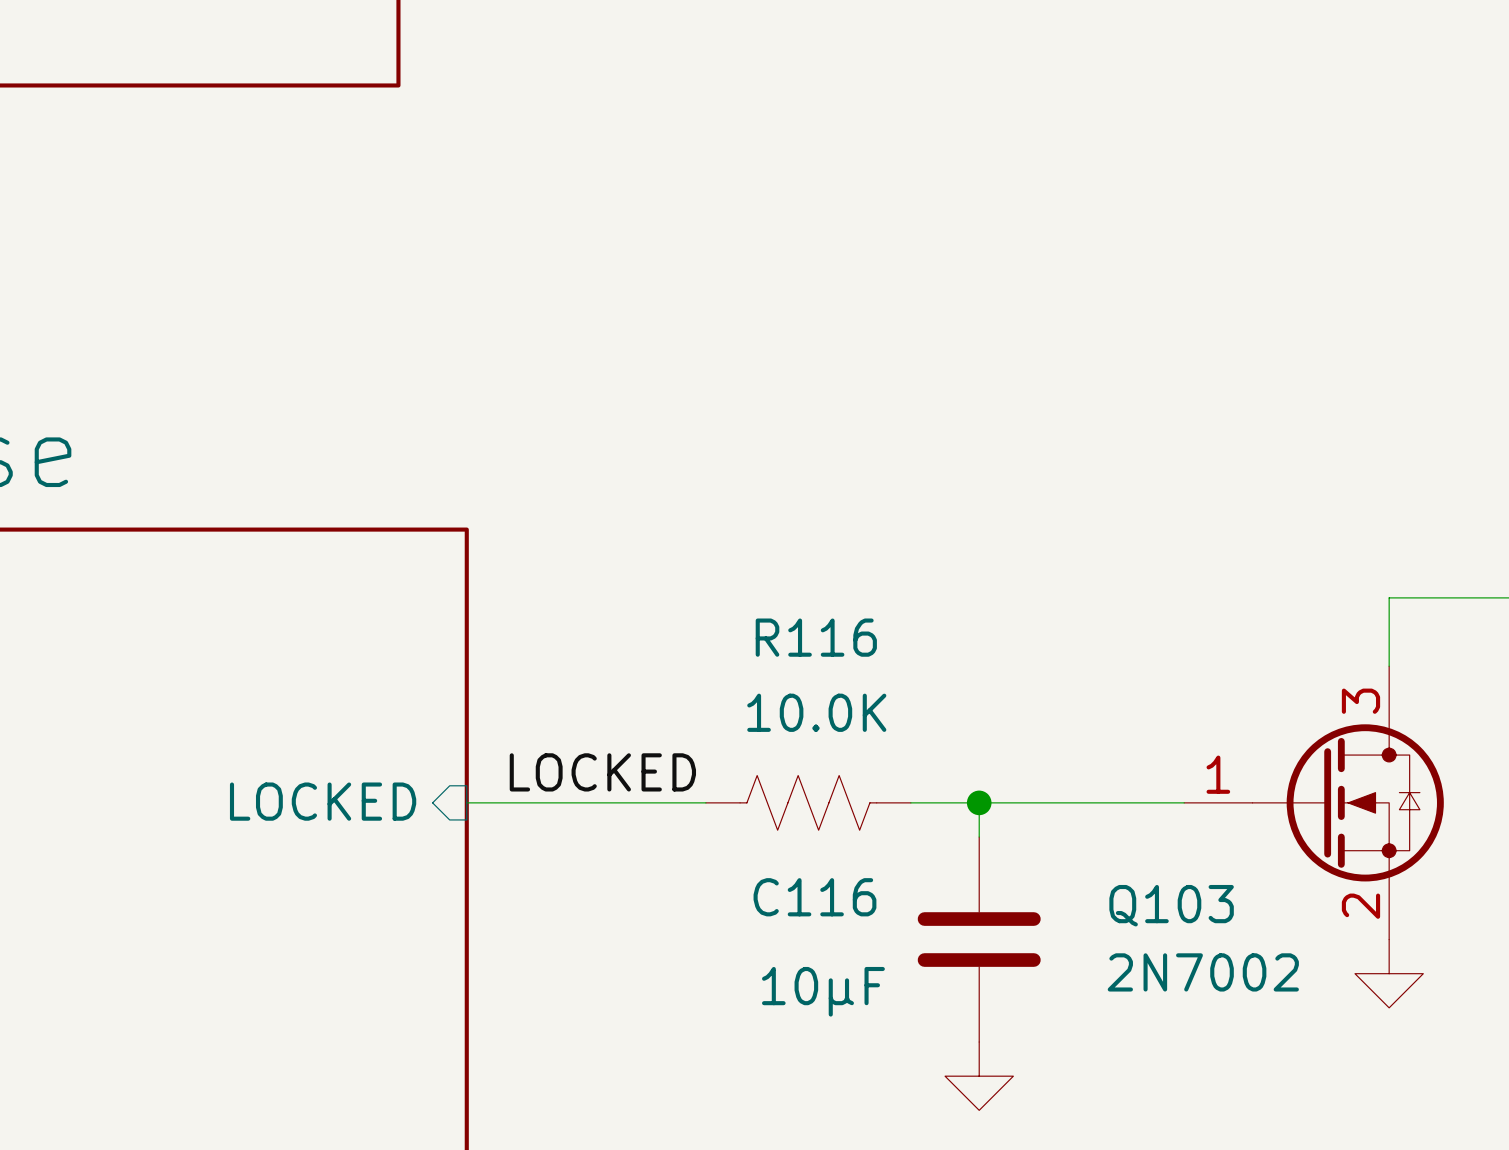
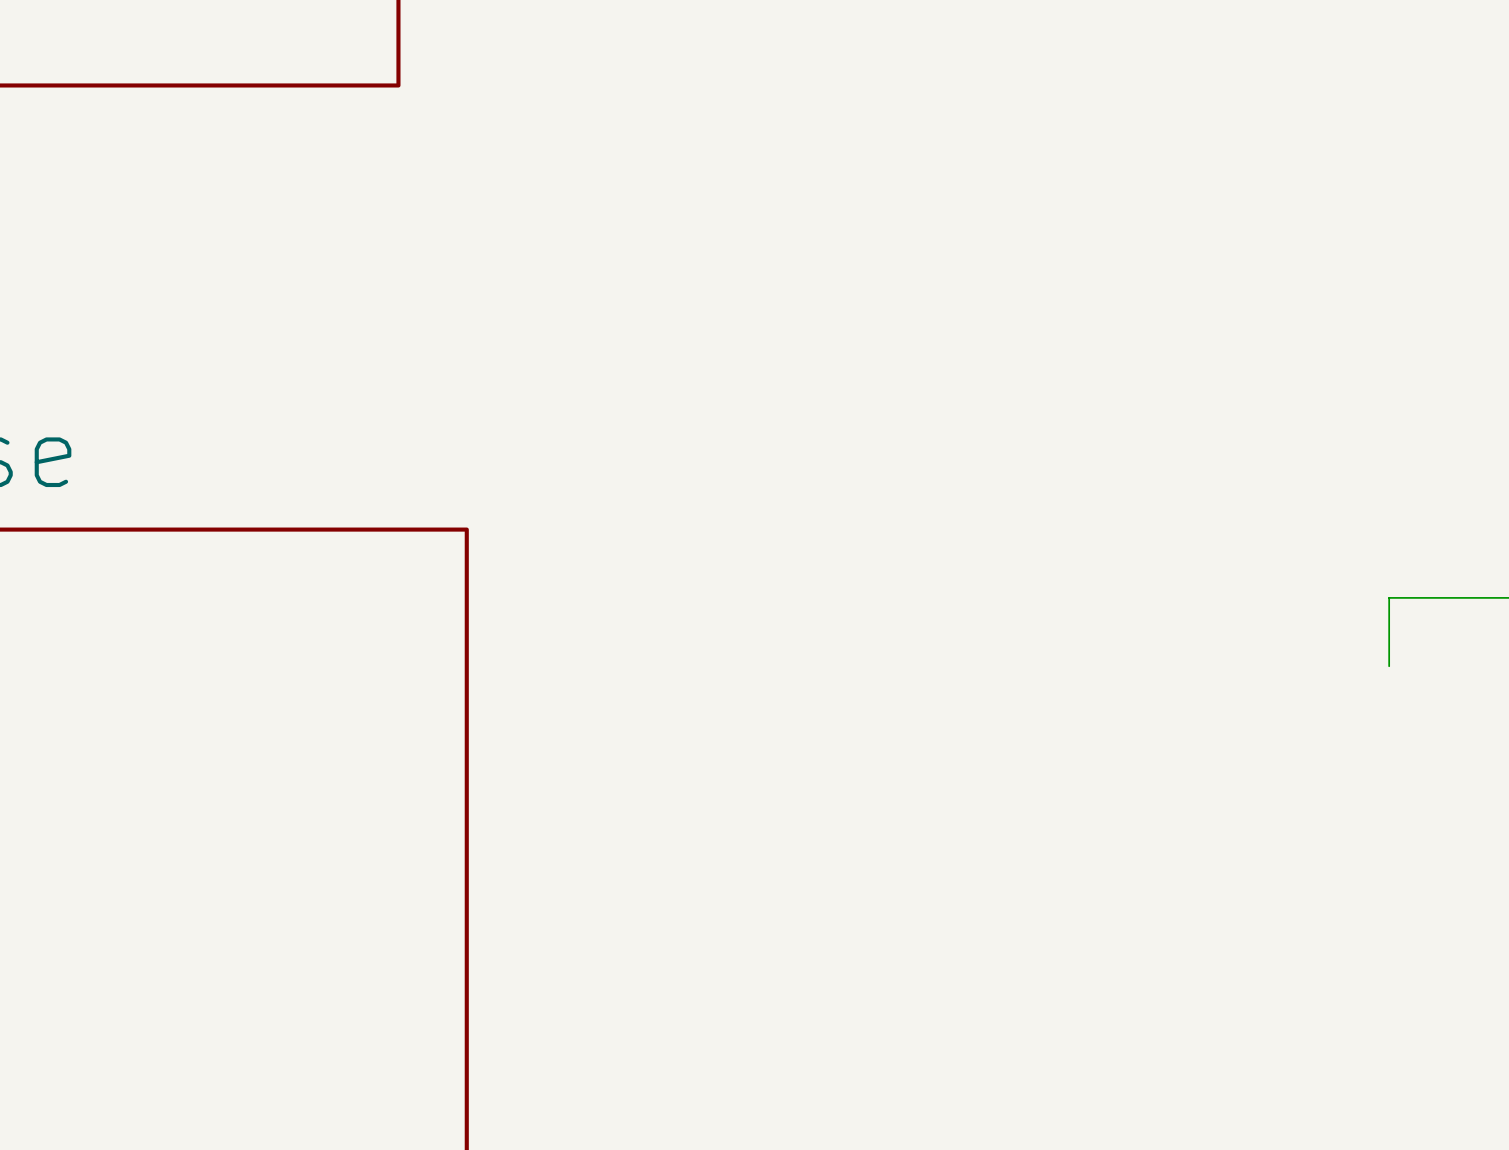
label: LOCKED (602, 772) -> none
sheet pin: LOCKED (323, 801) -> none
wire: (466, 802) (705, 802) -> none
R116: 10.0K (808, 802) -> none
wire: (910, 802) (1184, 802) -> none
wire: (979, 802) (979, 837) -> none
junction: (979, 802) -> none
Q103: 2N7002 (1314, 802) -> none
C116: 10μF (979, 939) -> none
power symbol: (1389, 973) -> none
power symbol: (979, 1076) -> none

